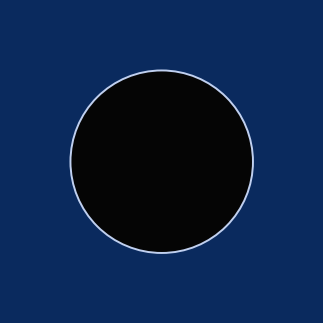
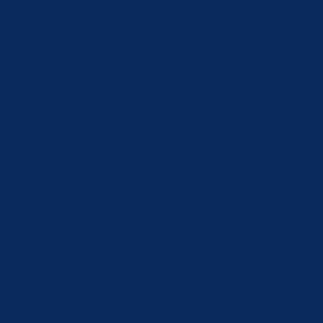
part: (161, 161) -> none

